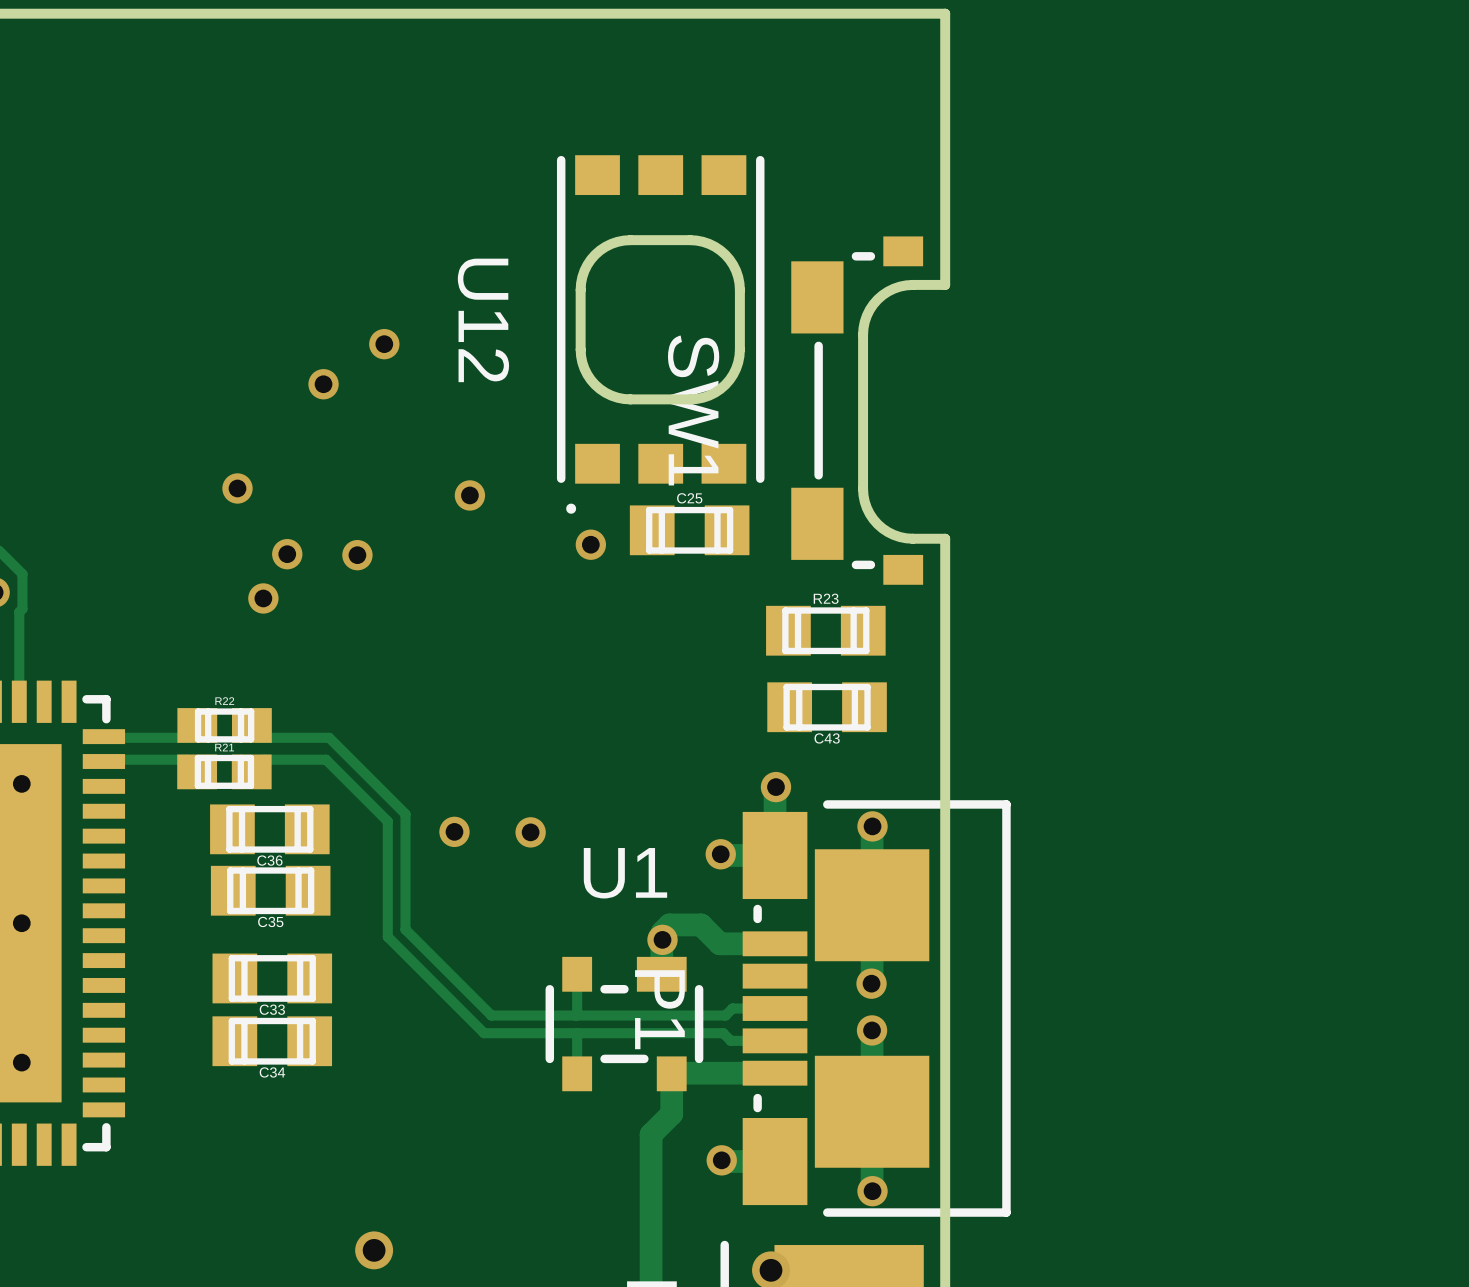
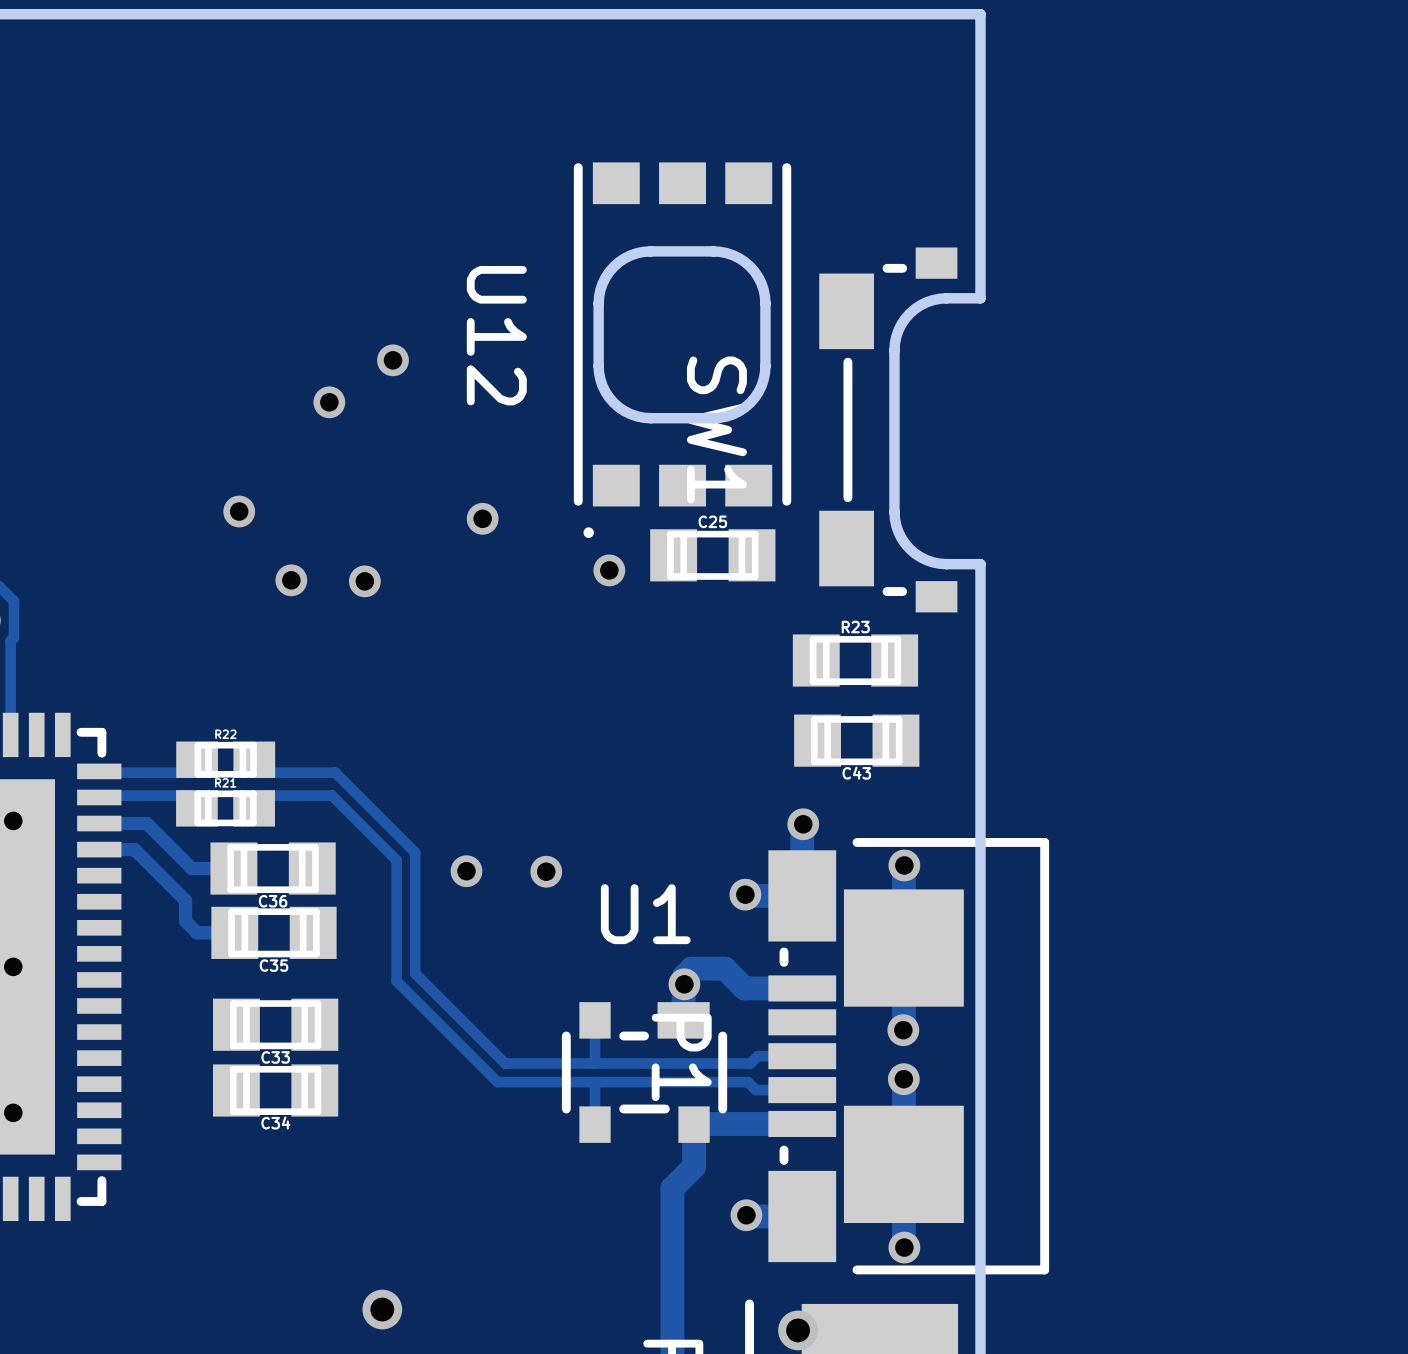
via: (263, 598) -> none
track: none -> (99, 823) (146, 823) (191, 868) (233, 868)
track: none -> (99, 849) (134, 849) (185, 900) (185, 921) (197, 932) (234, 932)

